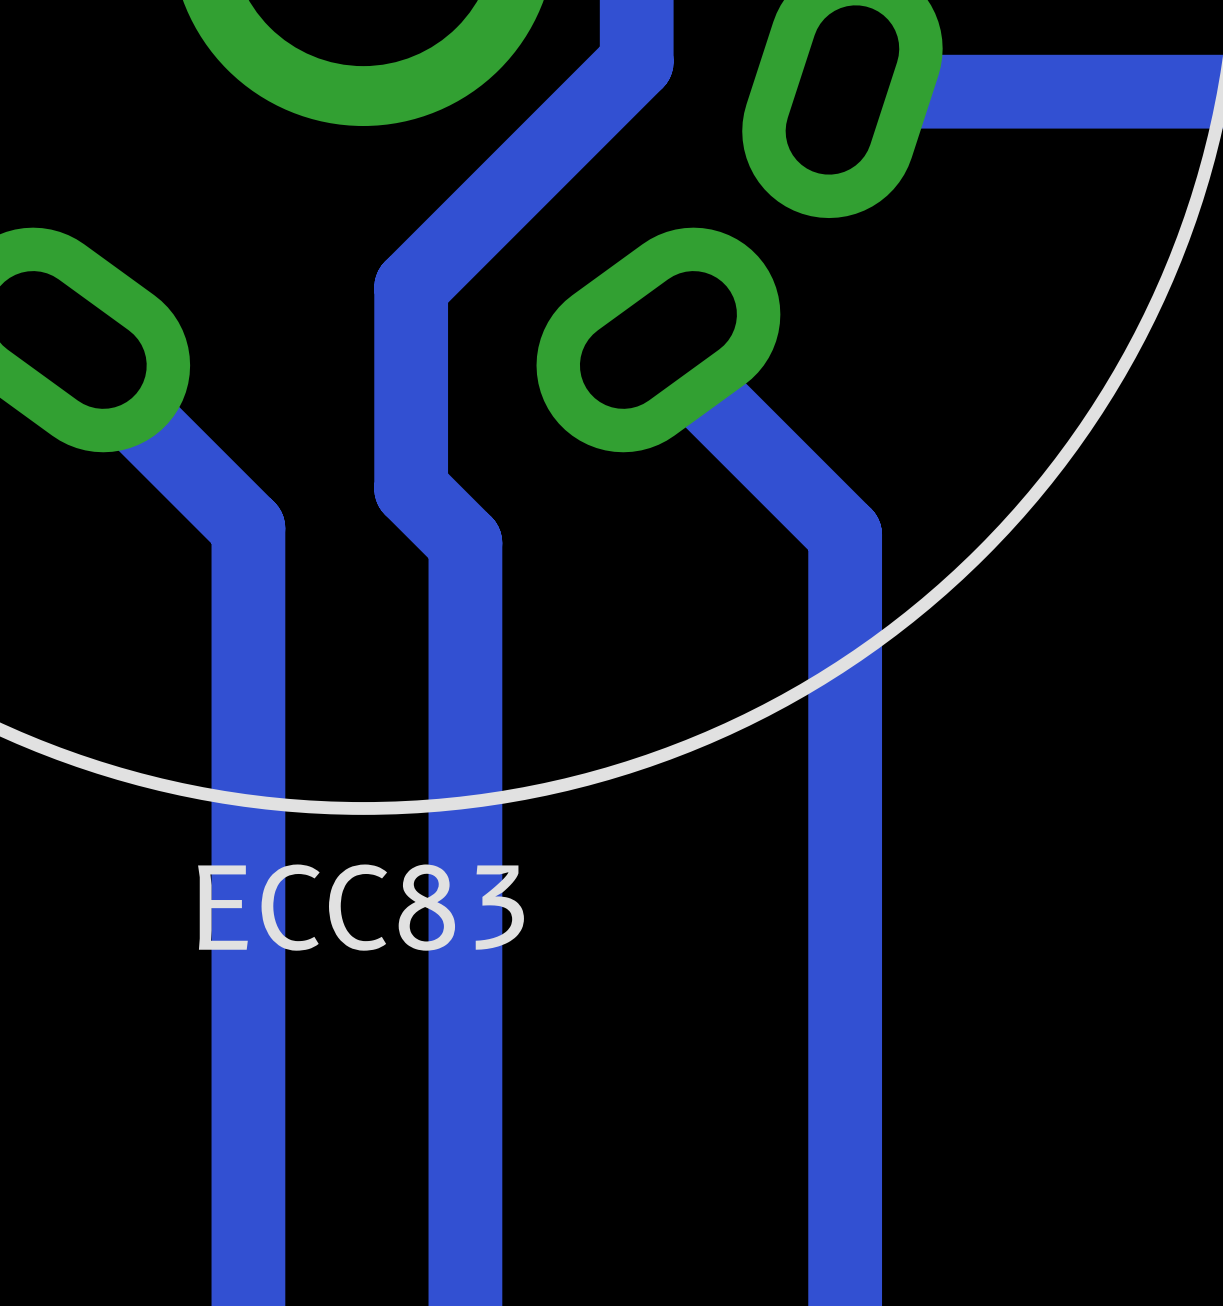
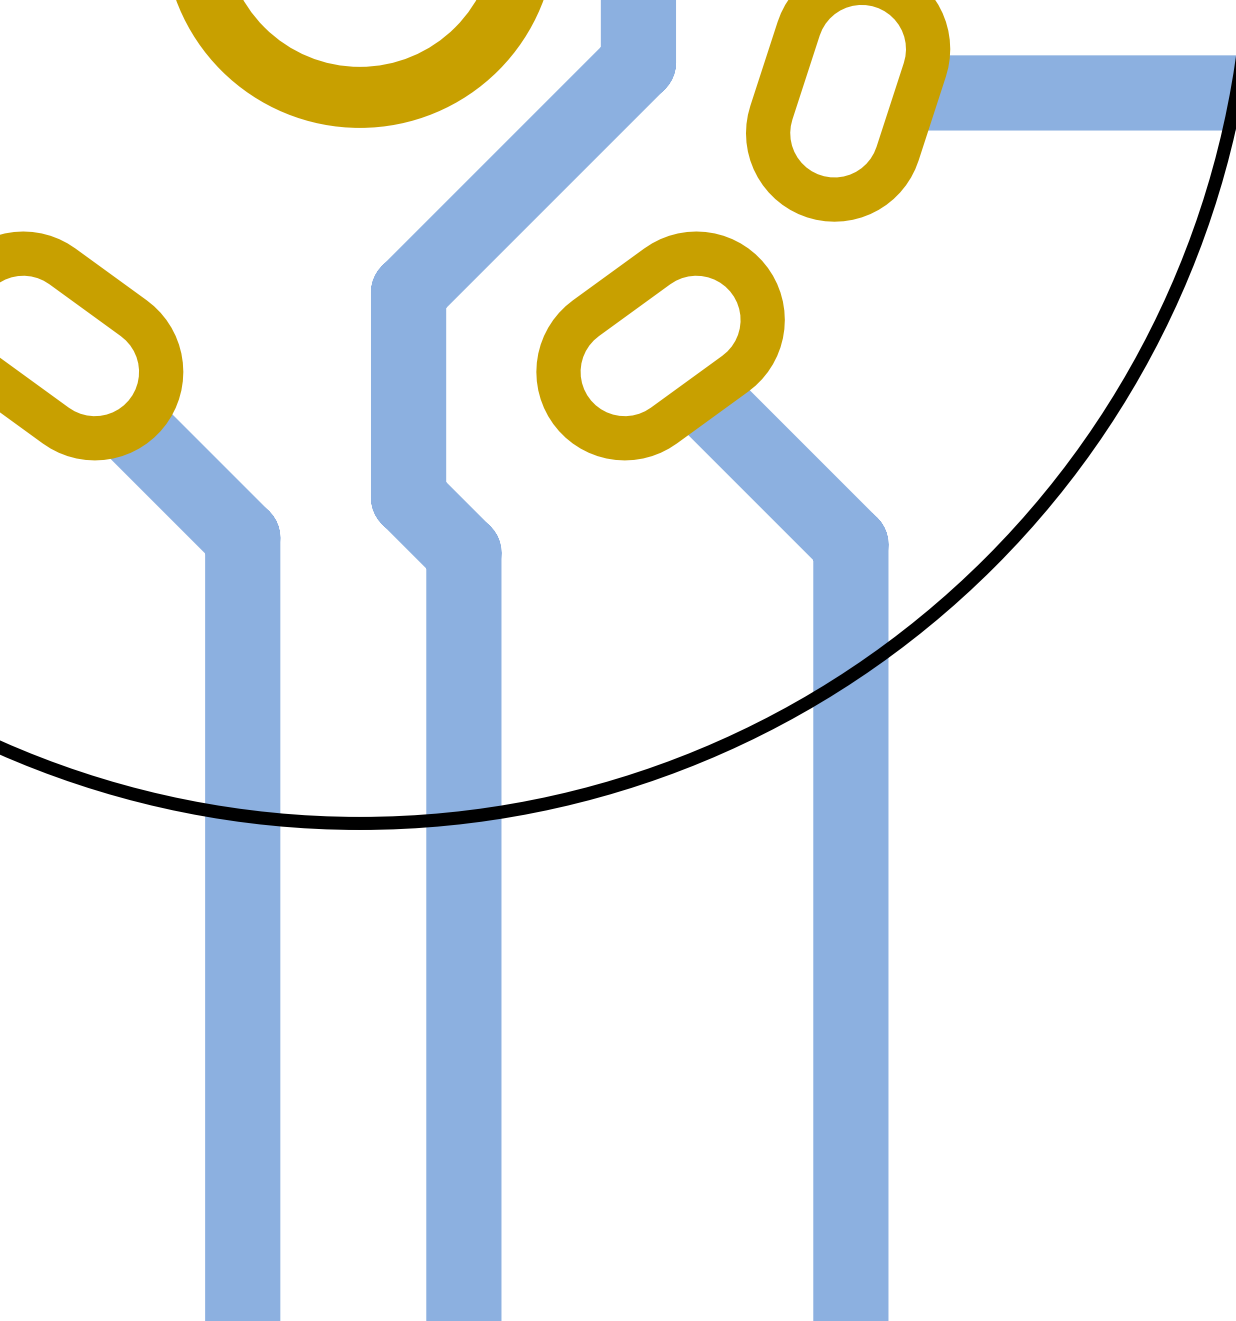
part value: ECC83 (361, 907) -> none

